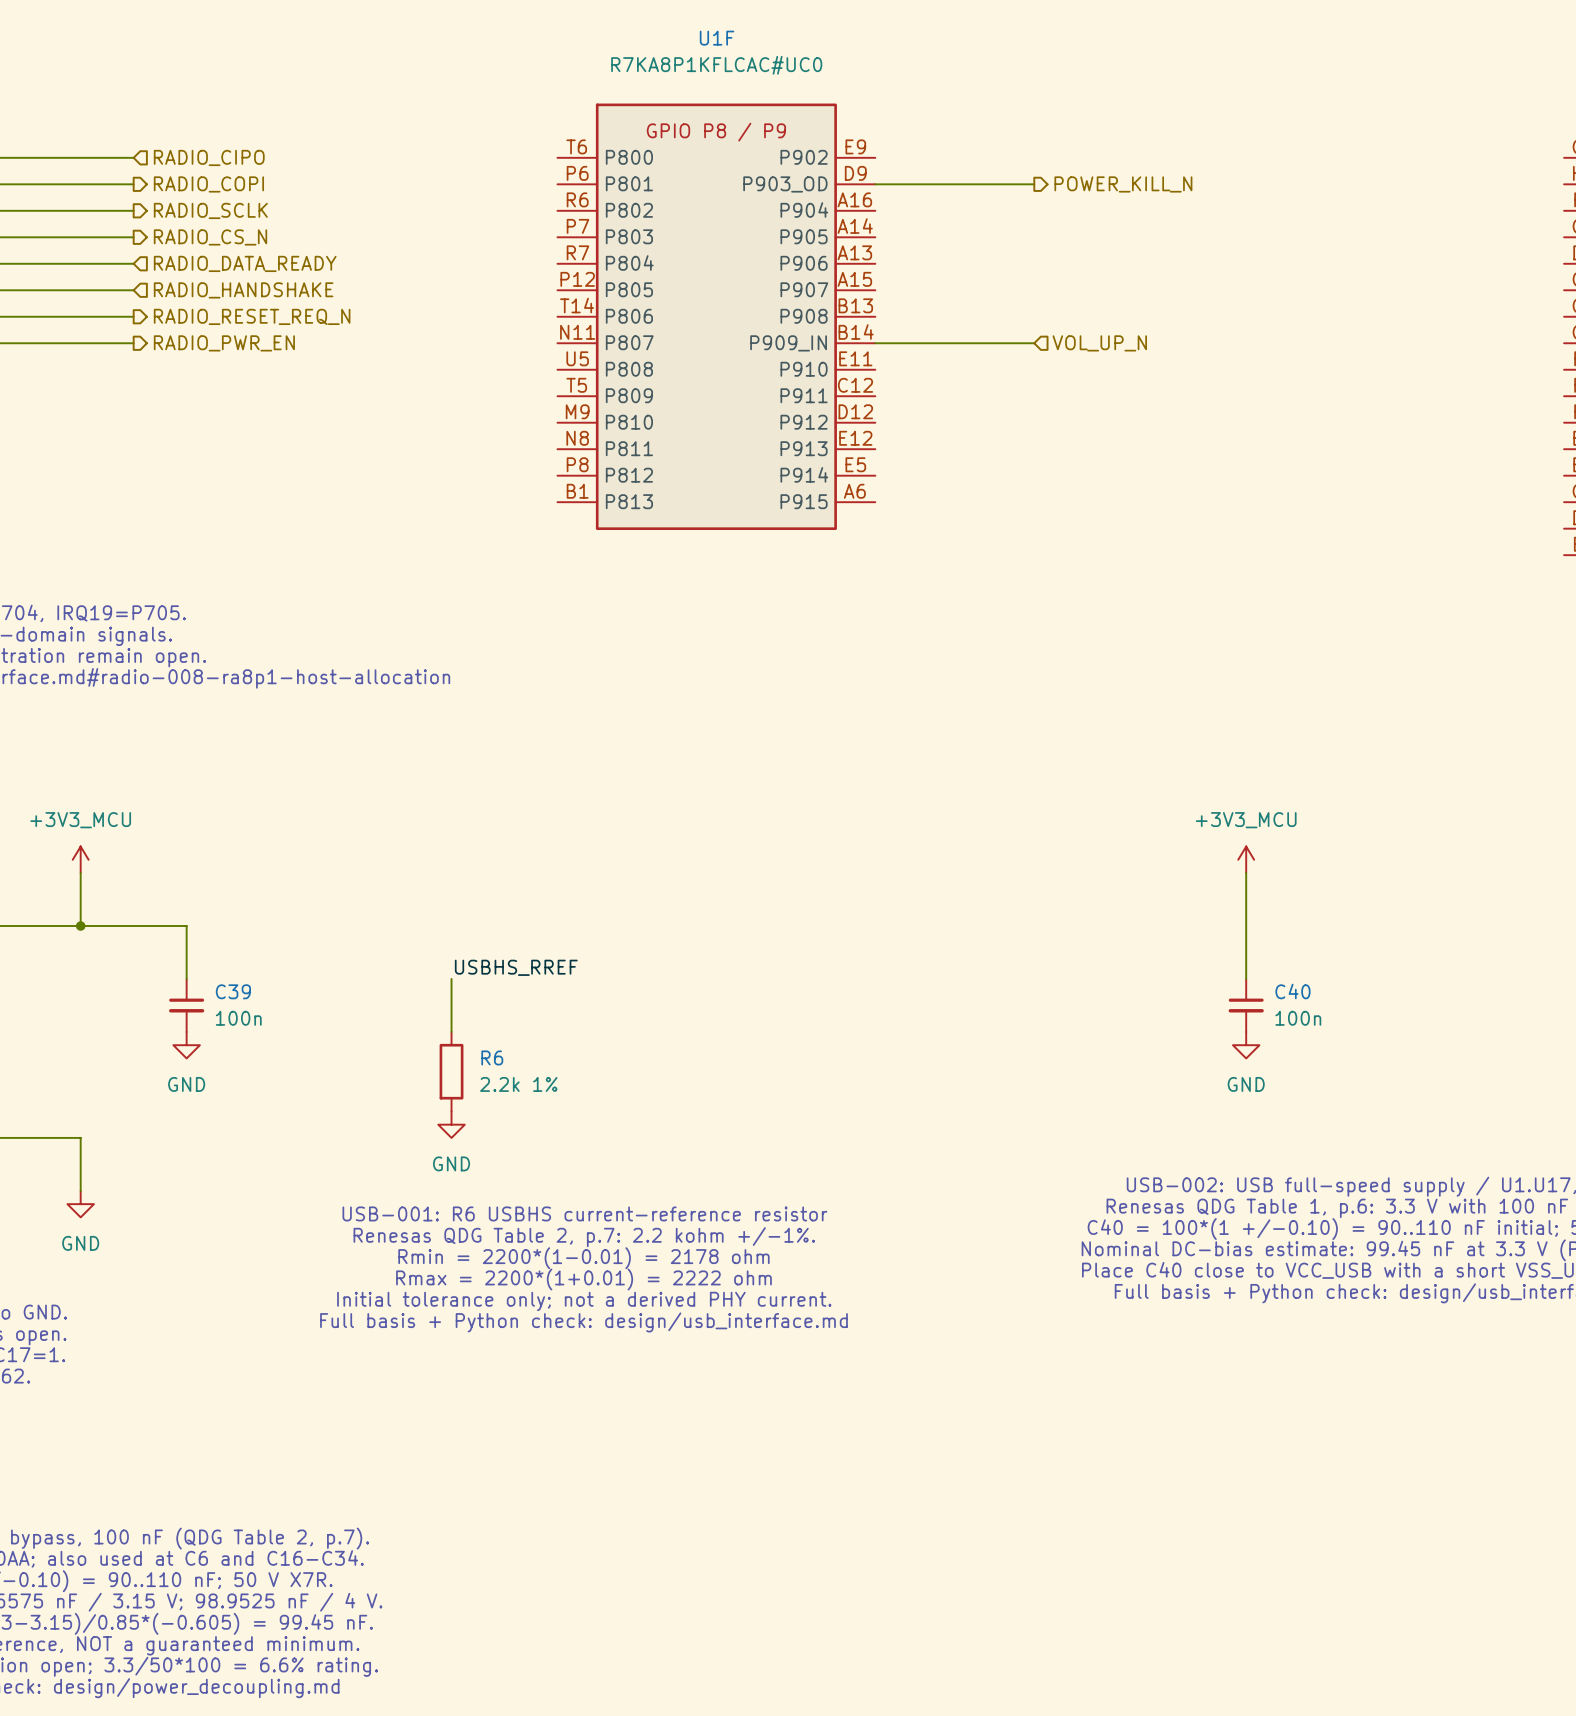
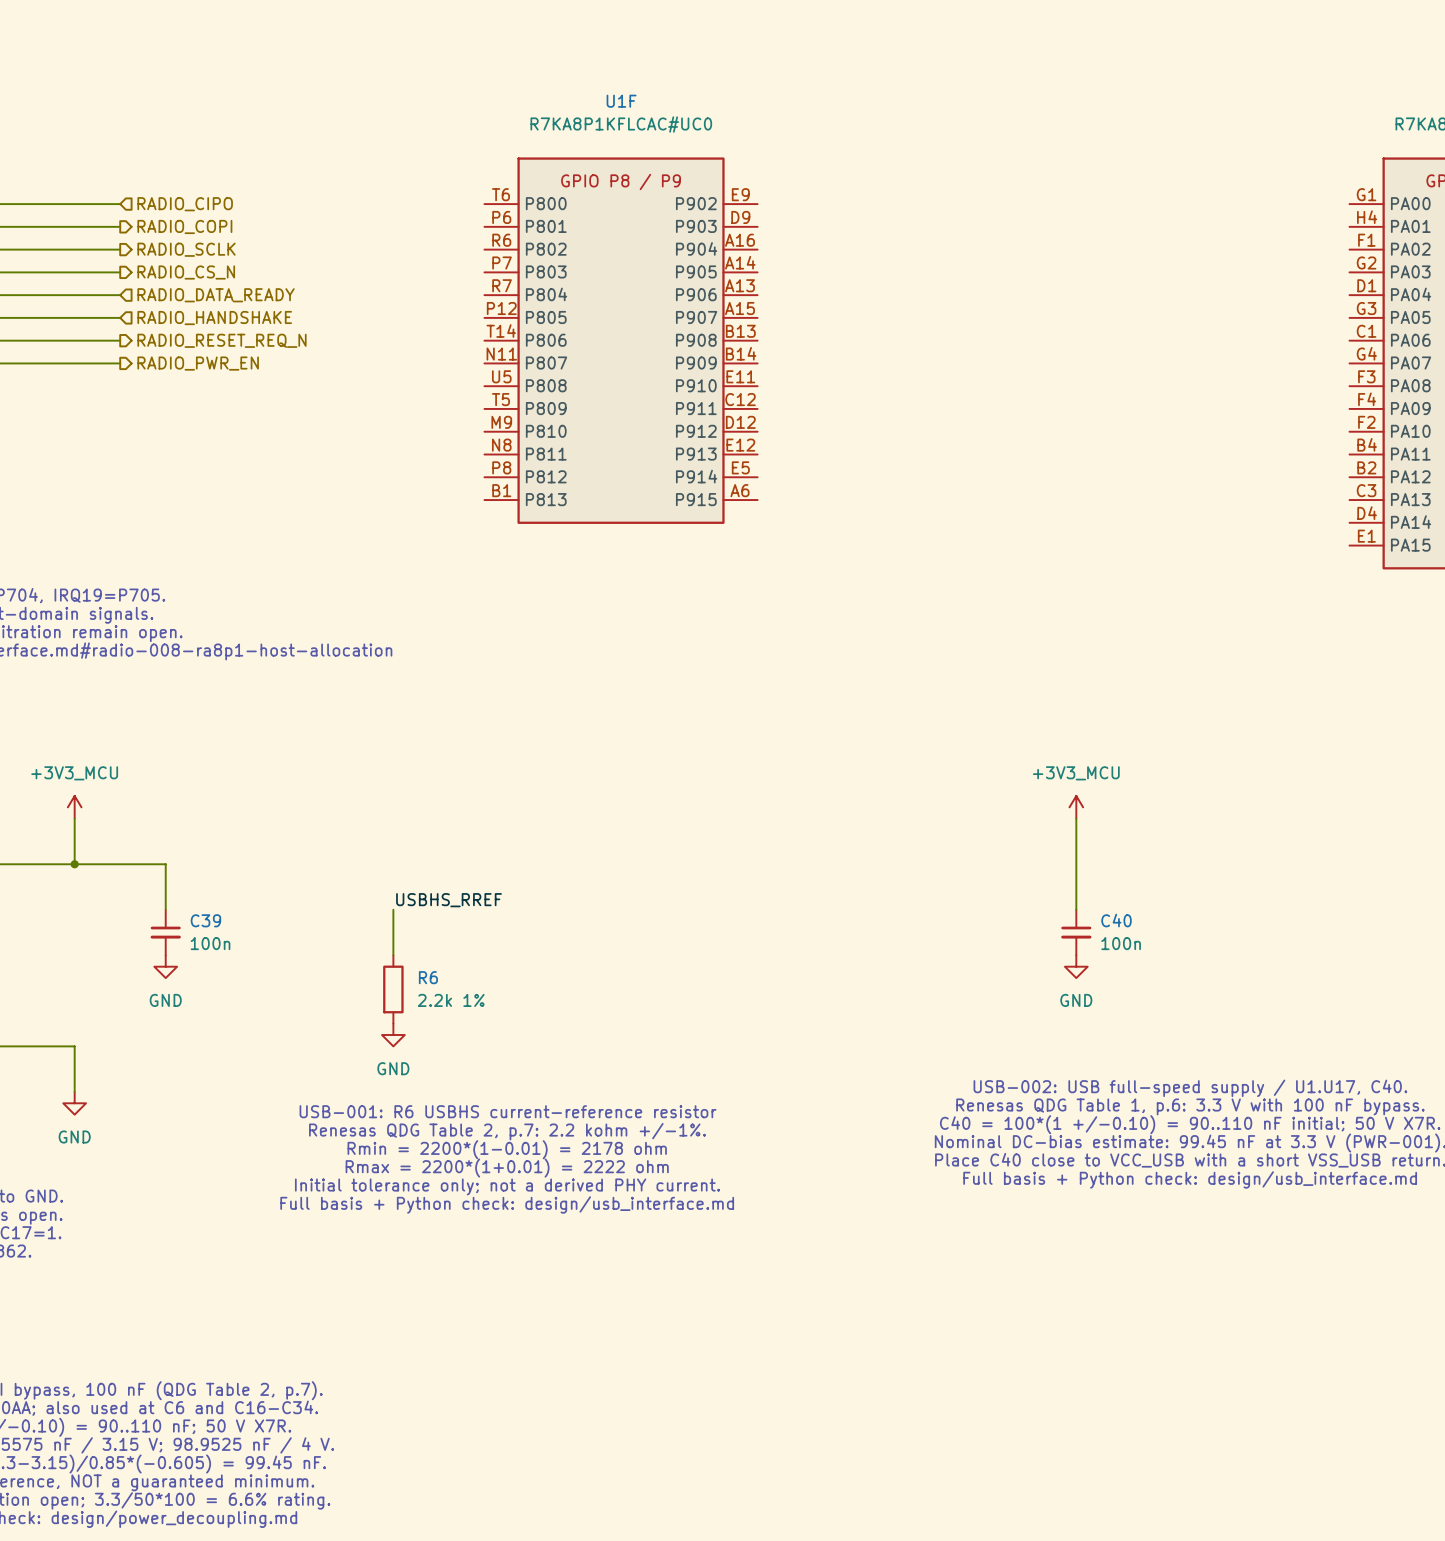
U1F pin name: P903_OD (785, 184) -> P903 (696, 226)
wire: (875, 184) (1034, 184) -> none
hierarchical label: POWER_KILL_N (1123, 184) -> none
U1F pin name: P909_IN (788, 343) -> P909 (696, 363)
wire: (875, 343) (1034, 343) -> none
hierarchical label: VOL_UP_N (1099, 343) -> none

